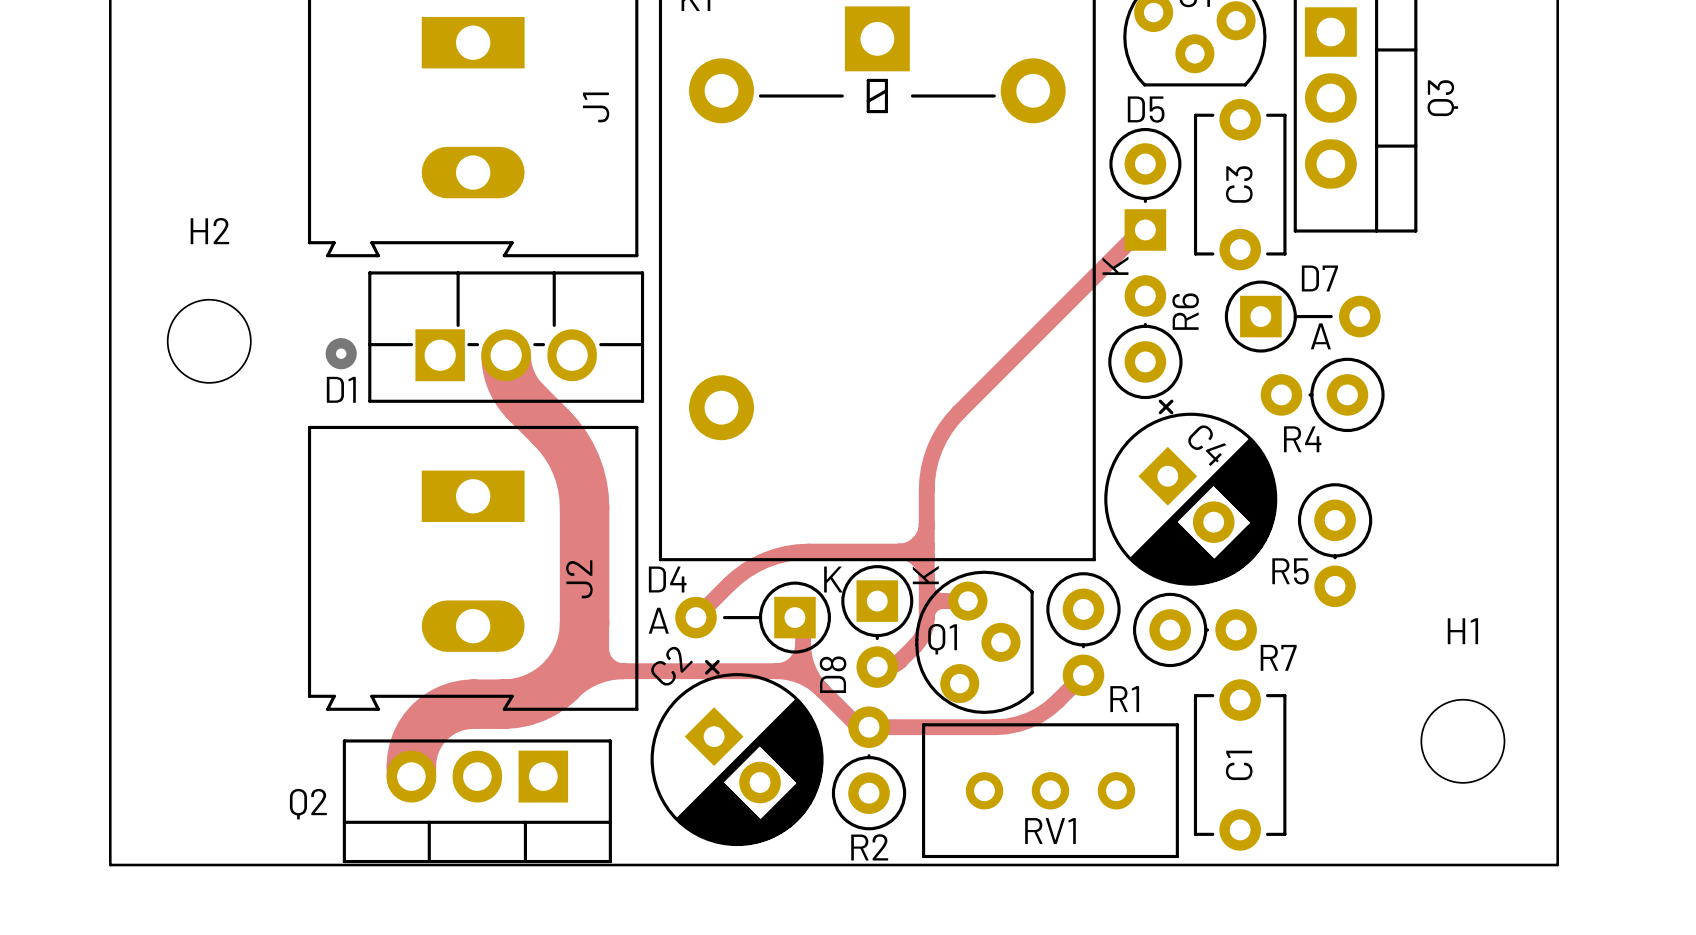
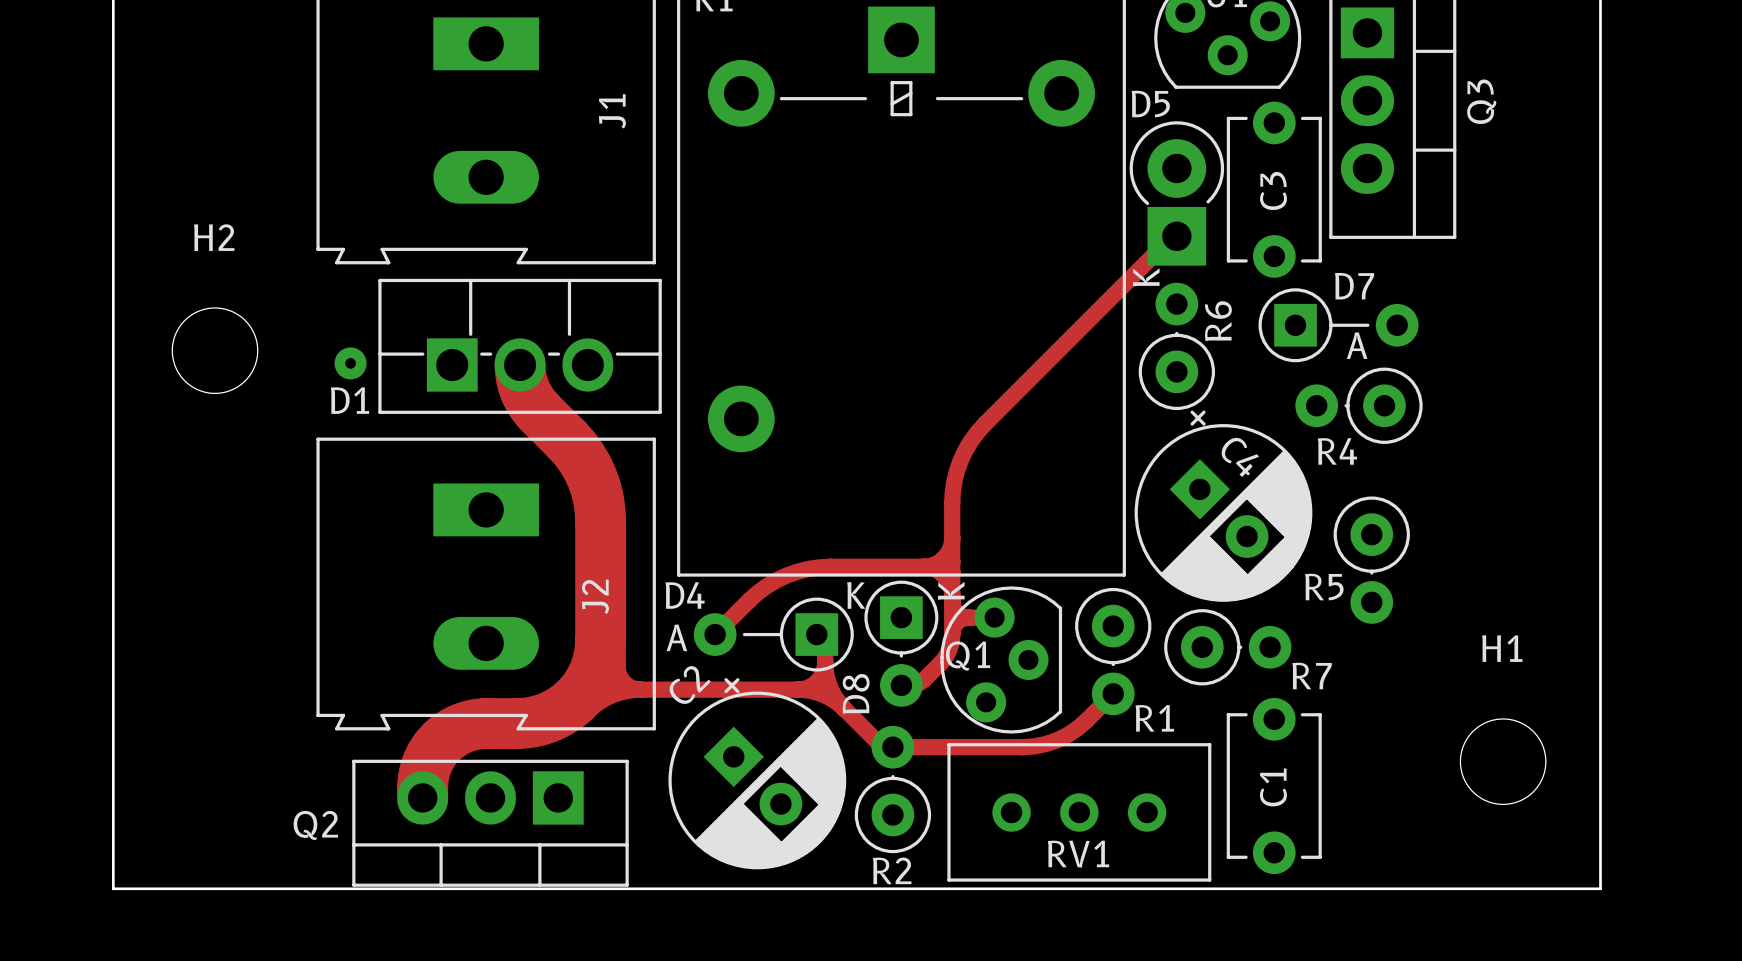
D5 footprint: [1109, 127, 1182, 251] -> [1129, 121, 1225, 266]

